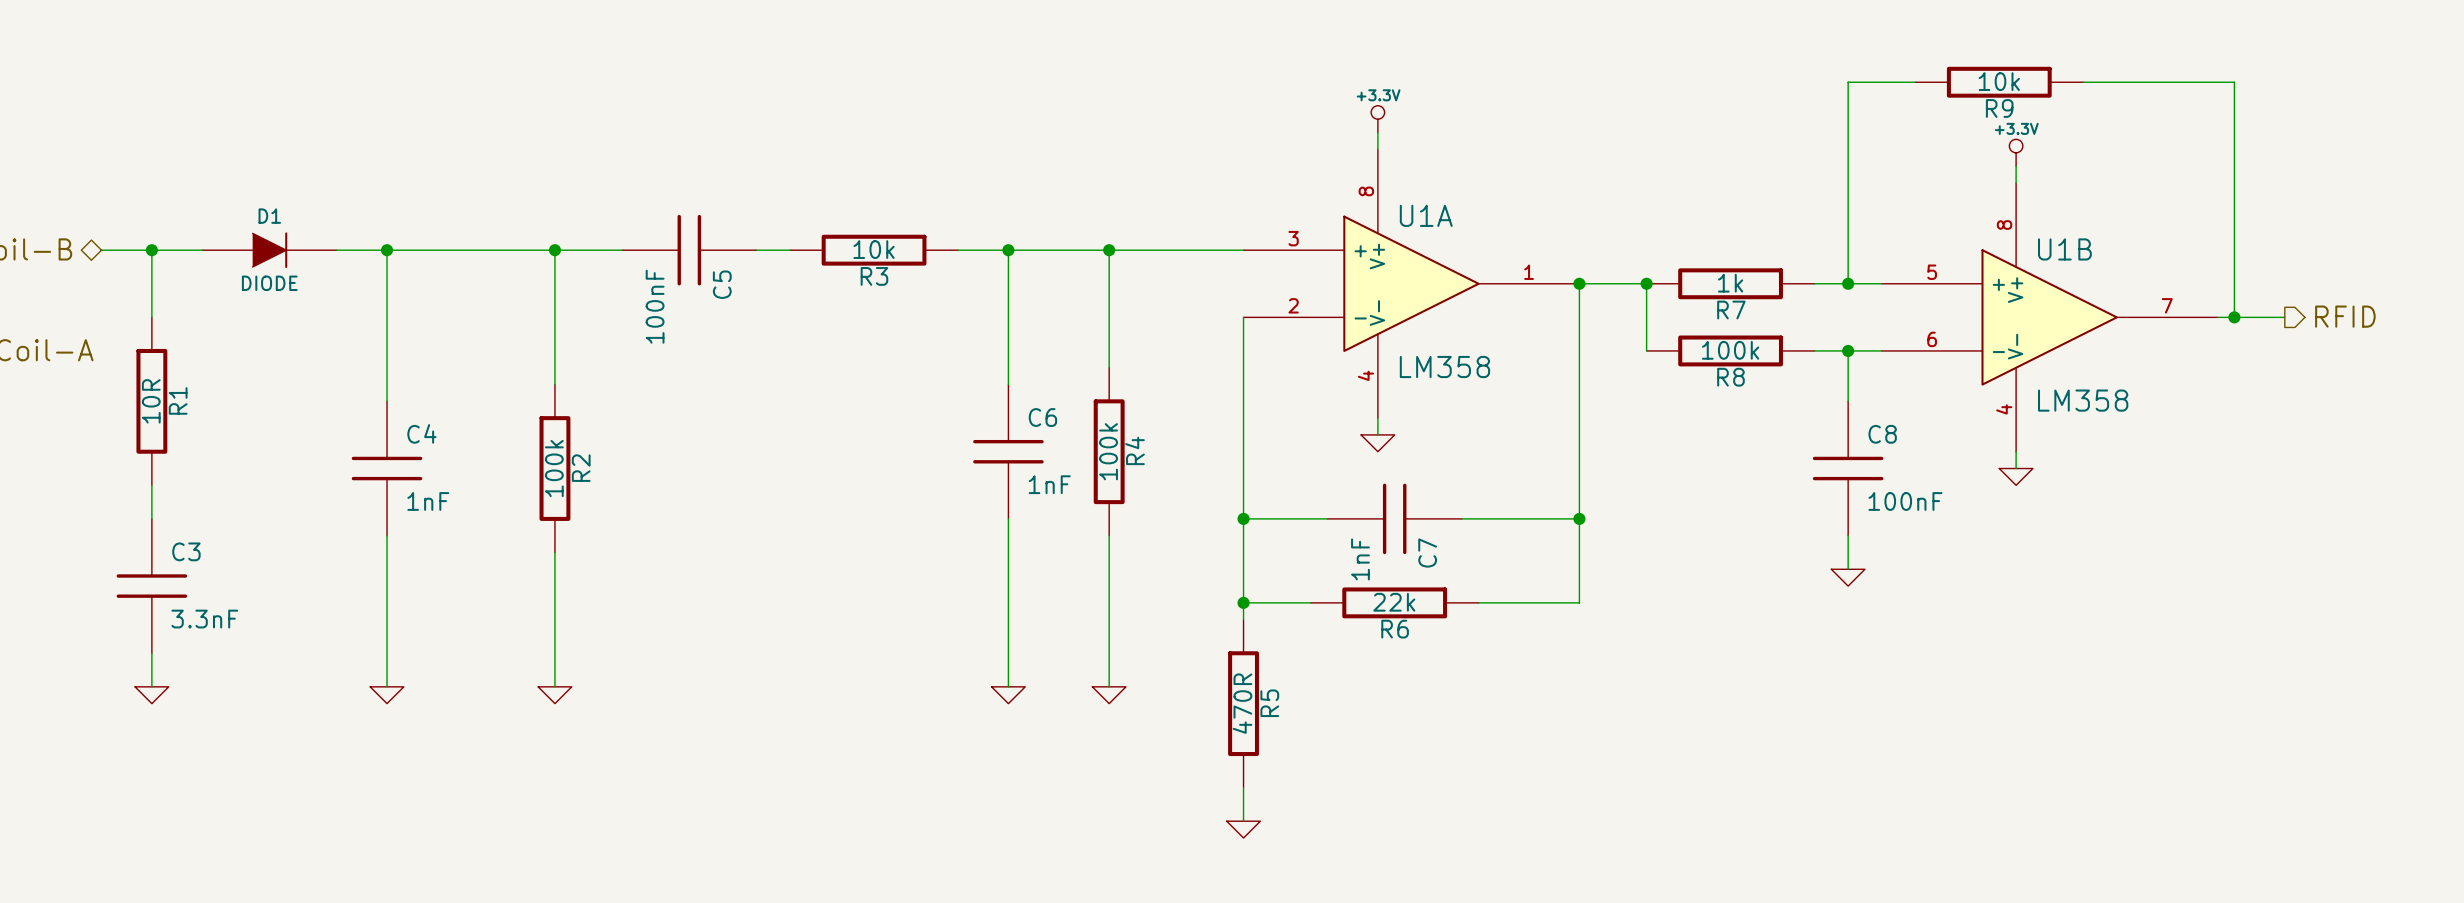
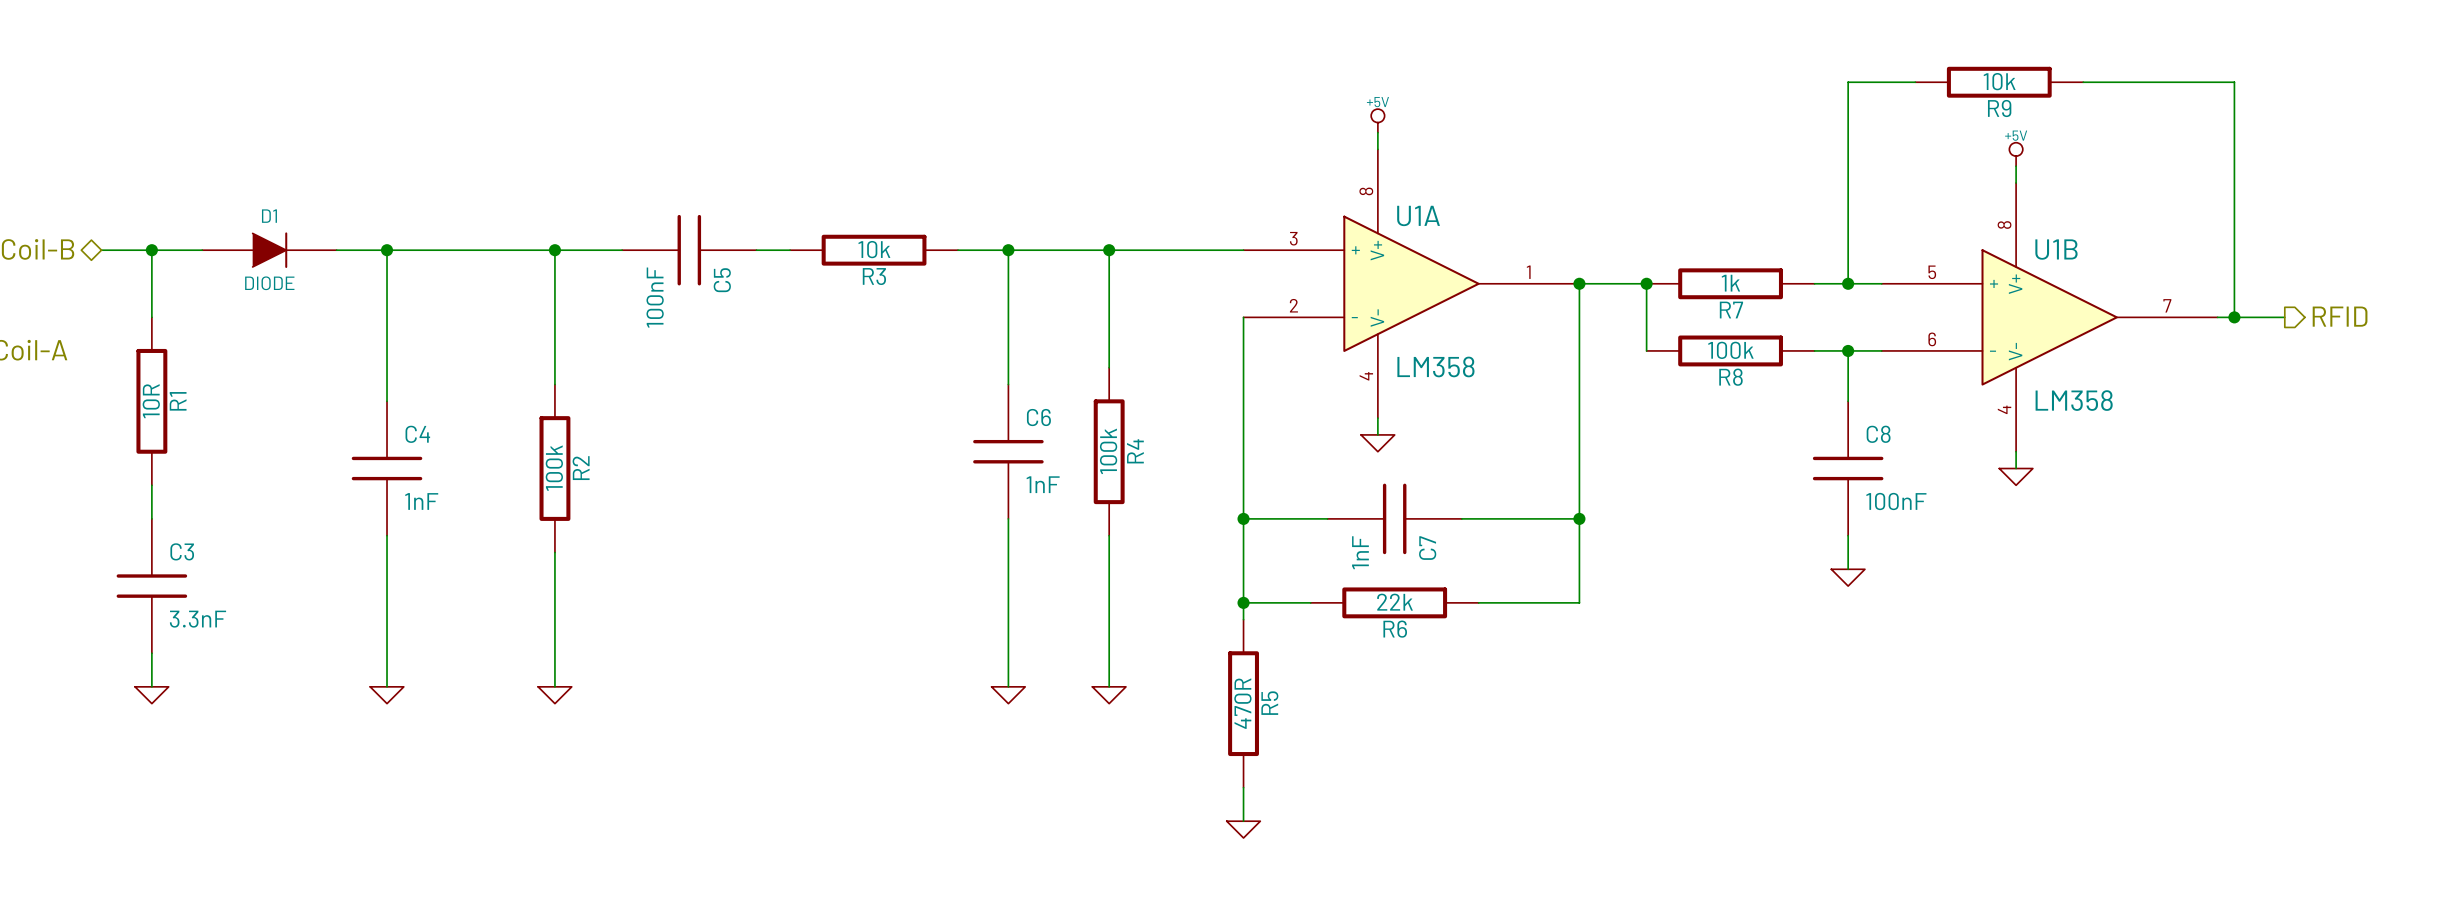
power symbol: +3.3V (1377, 119) -> +5V (1377, 120)
power symbol: +3.3V (2016, 152) -> +5V (2016, 154)

